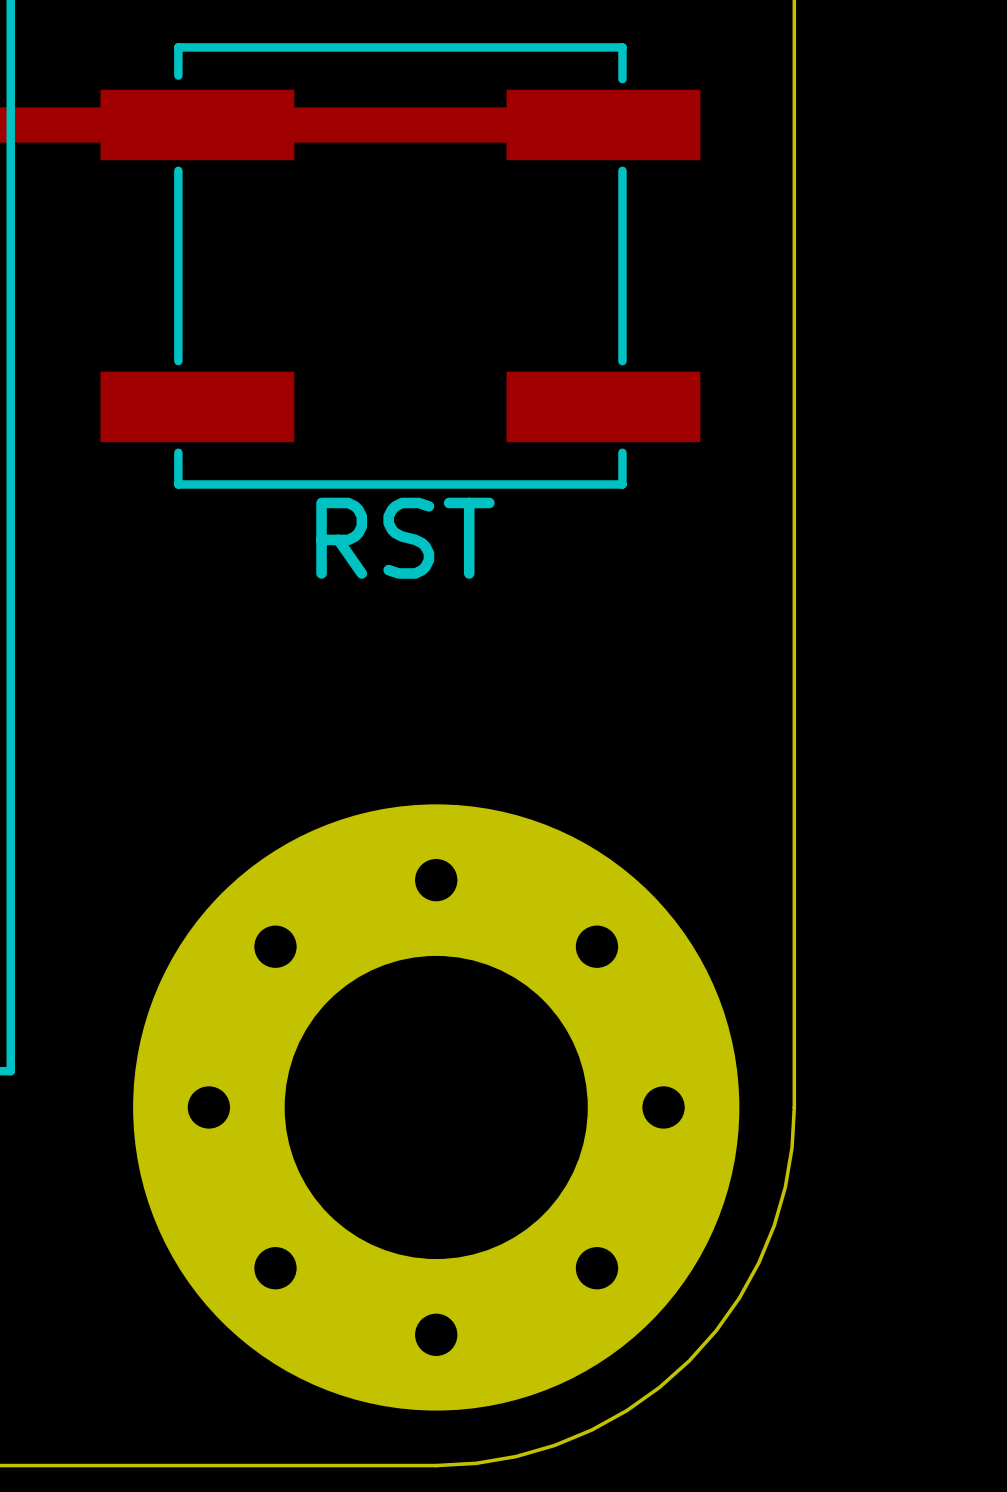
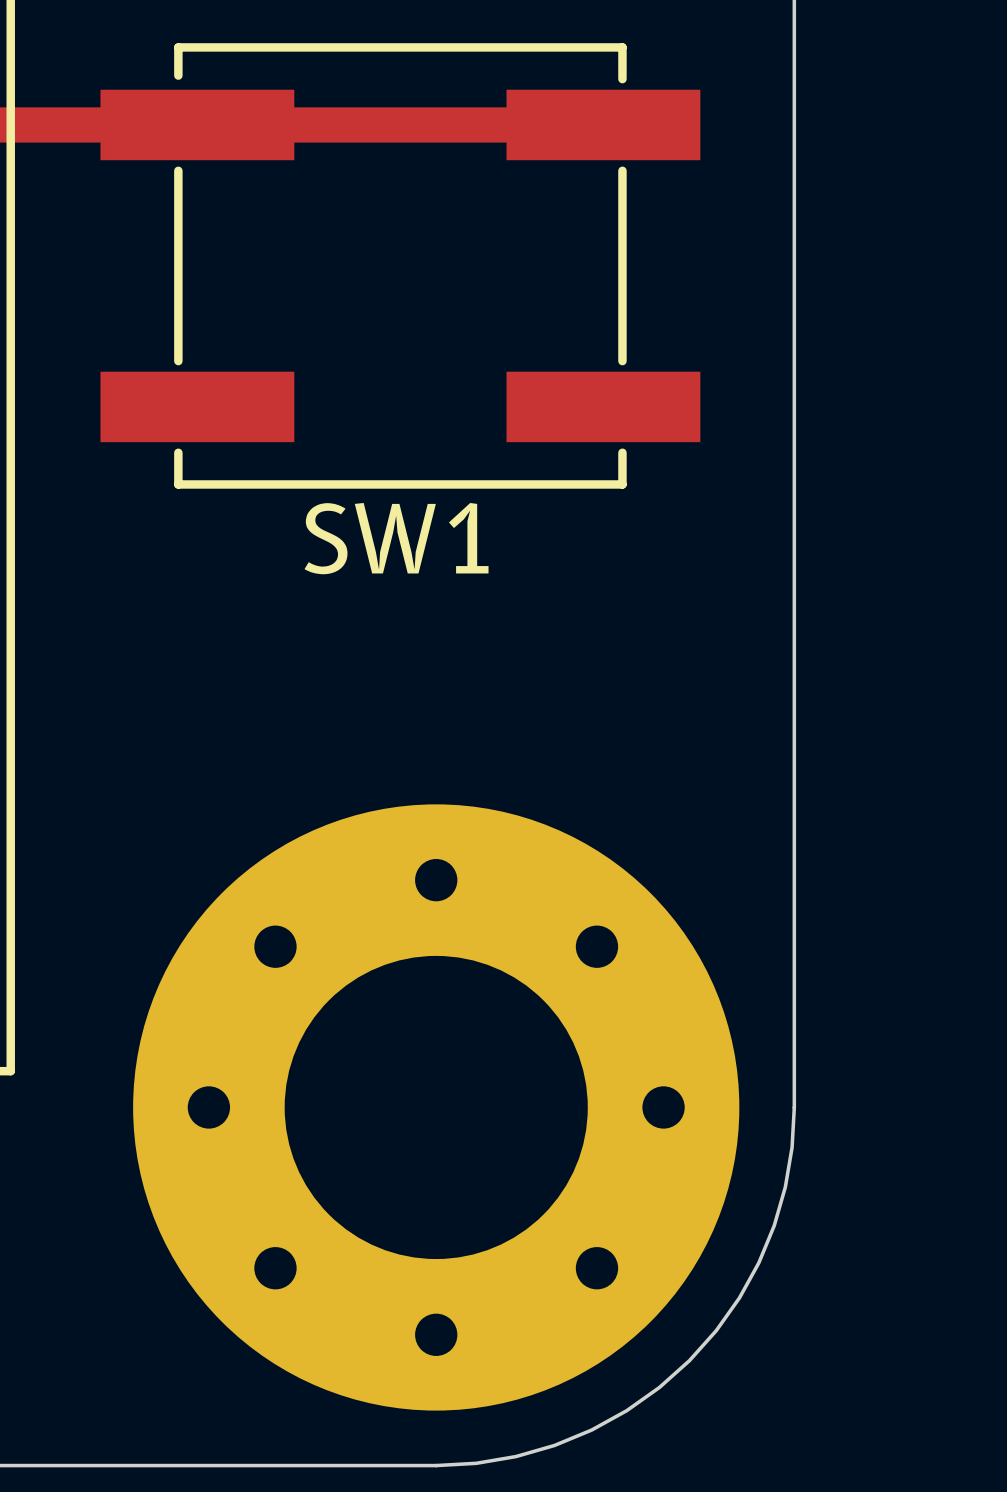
RST name: RST (405, 538) -> SW1 (396, 538)

